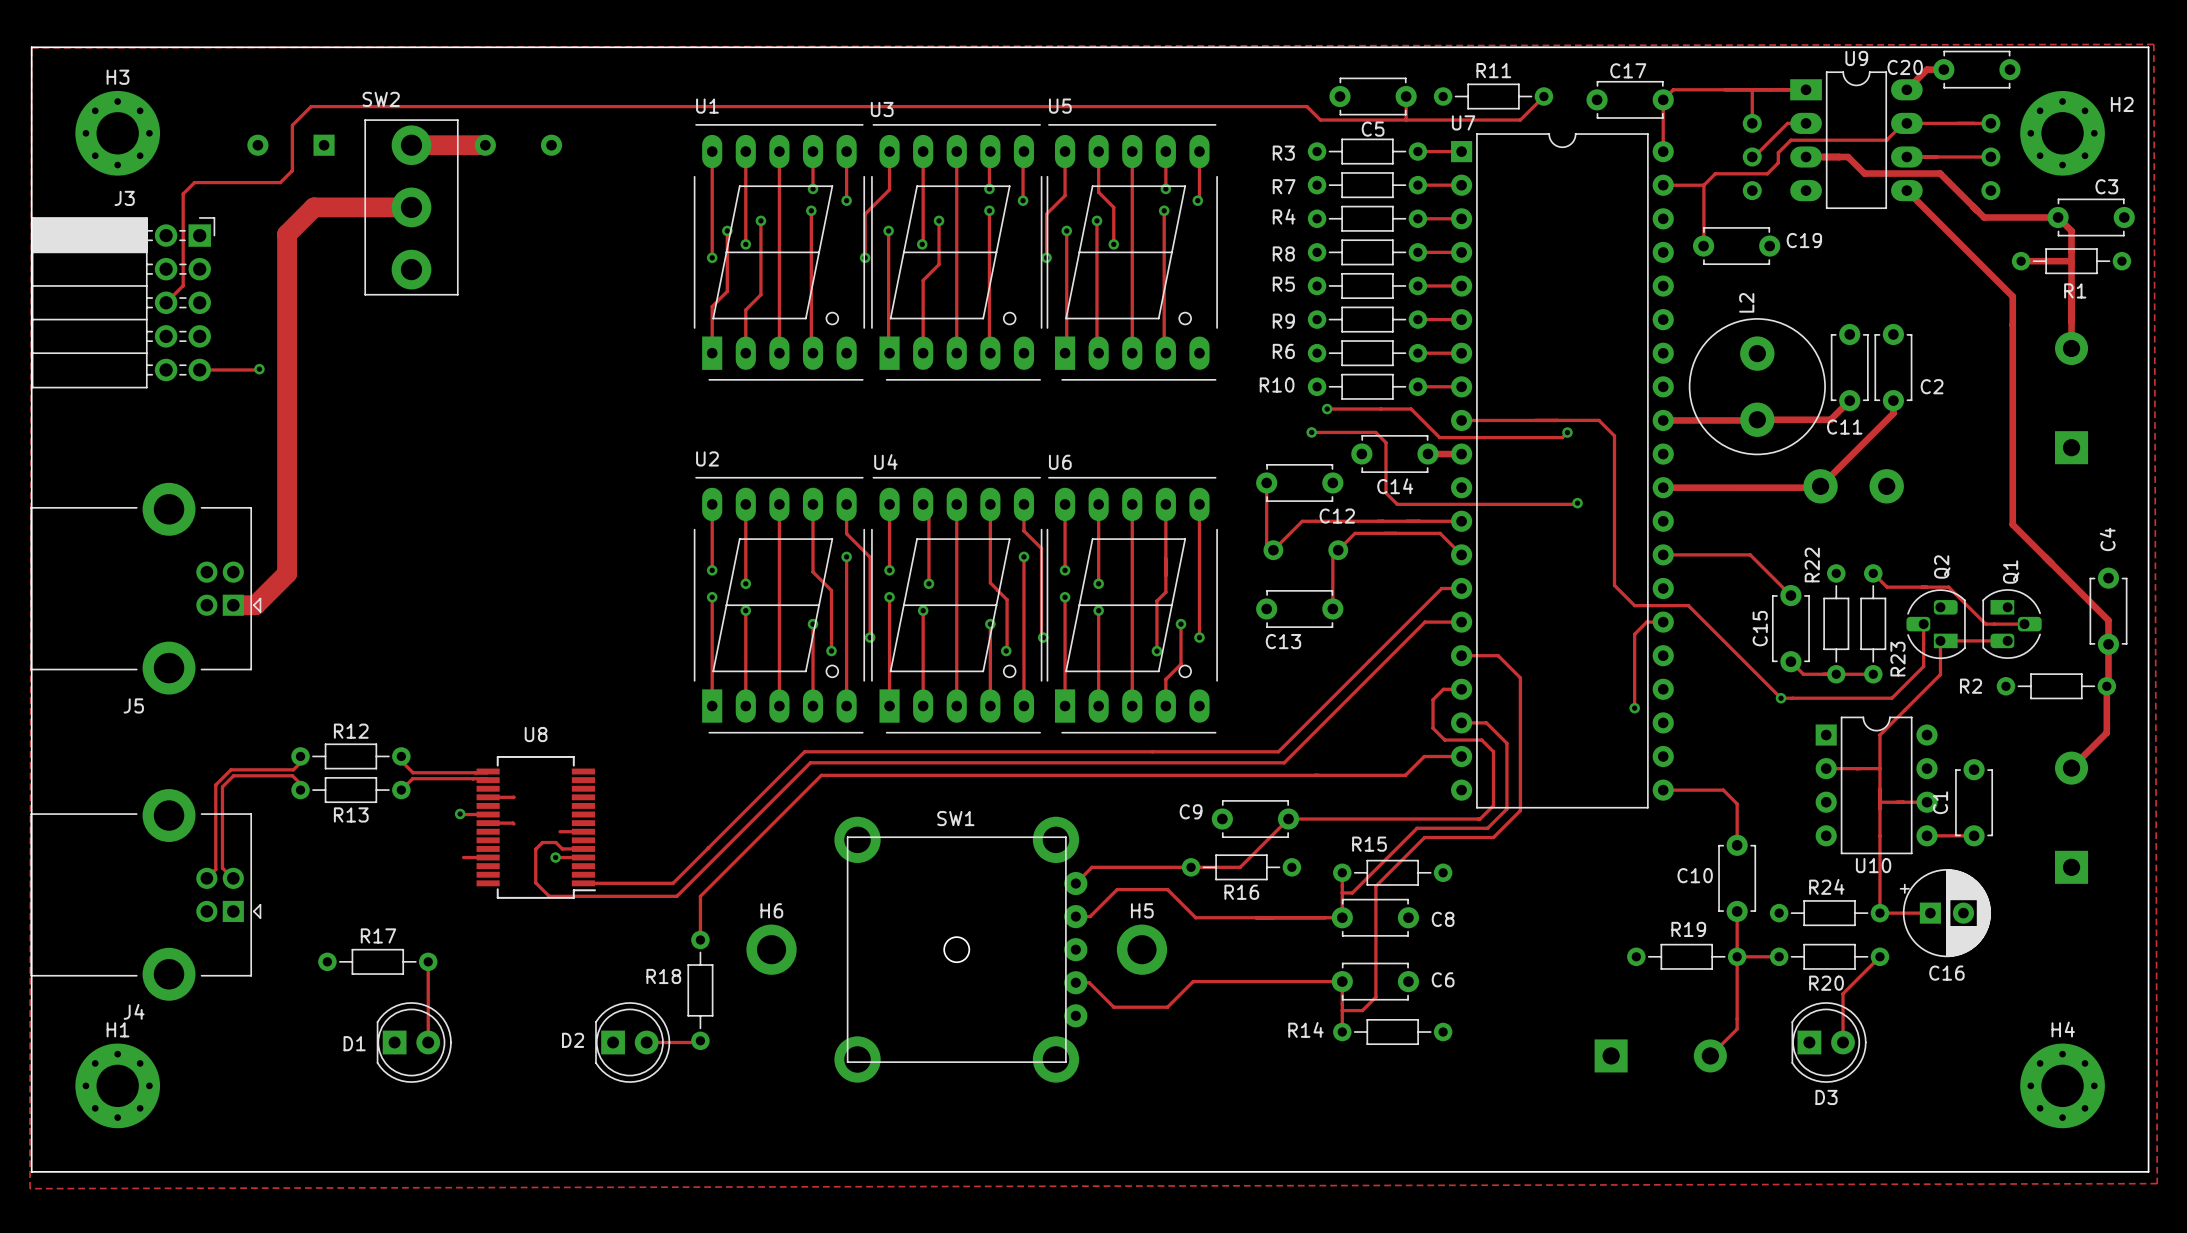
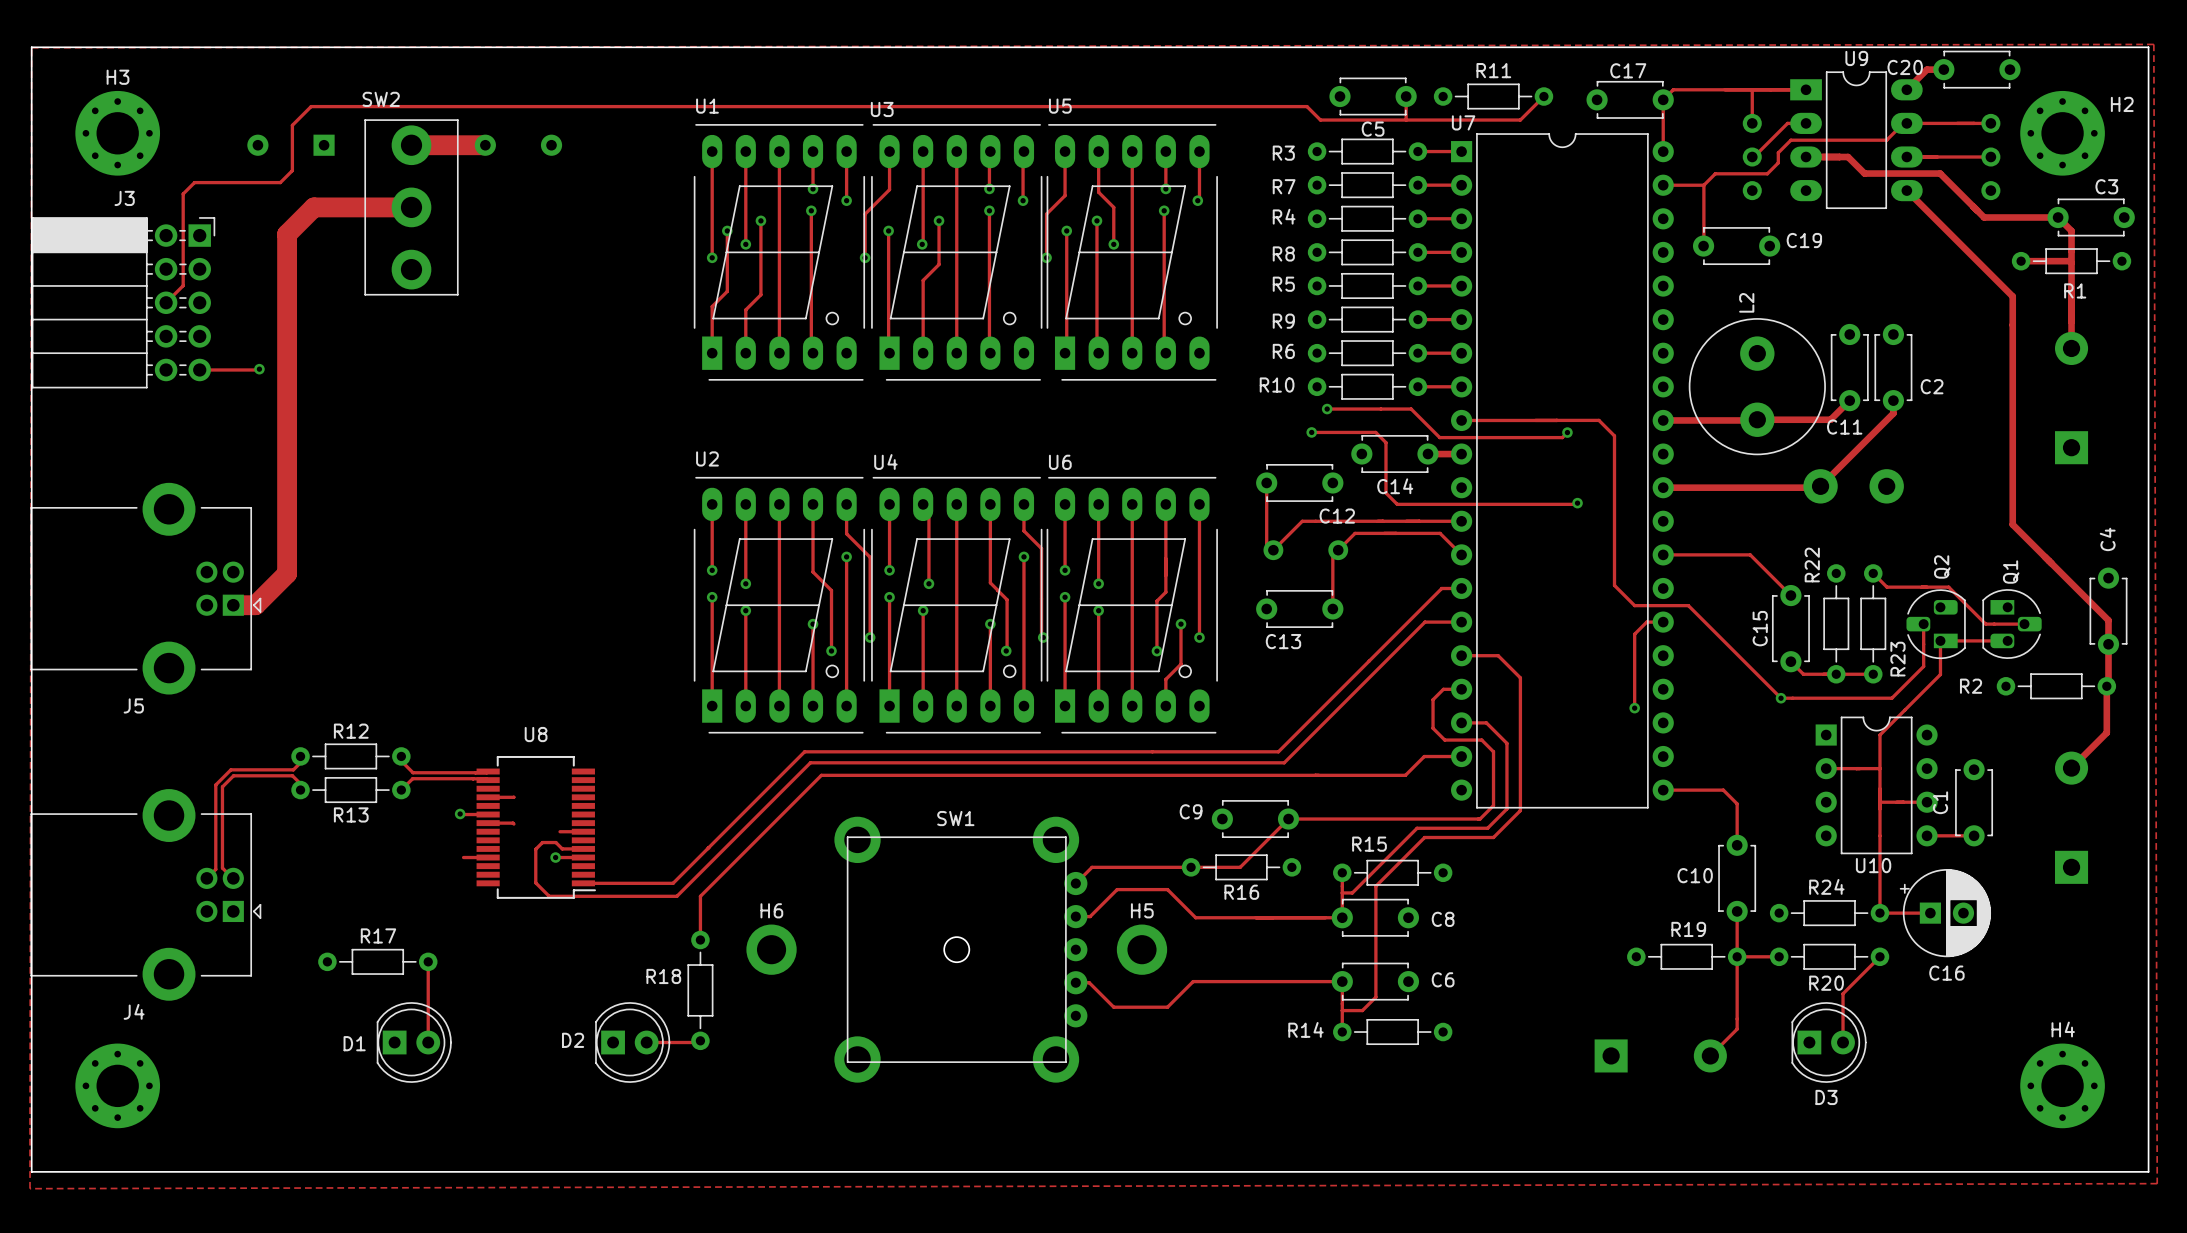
H1 name: H1 (118, 1029) -> none

